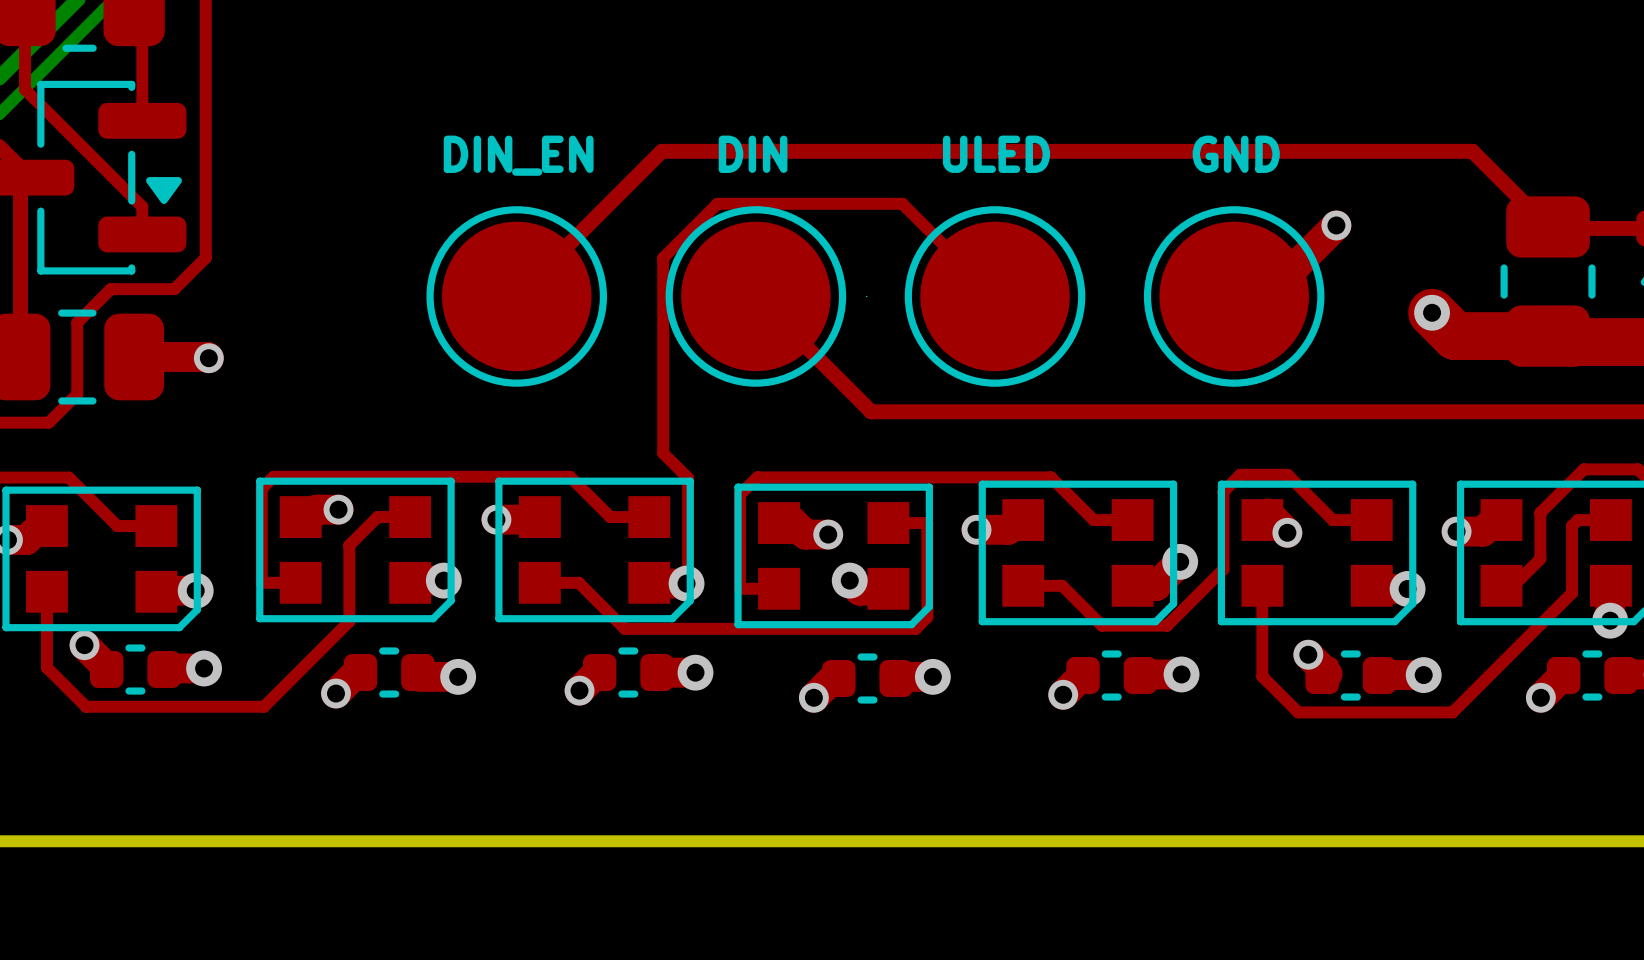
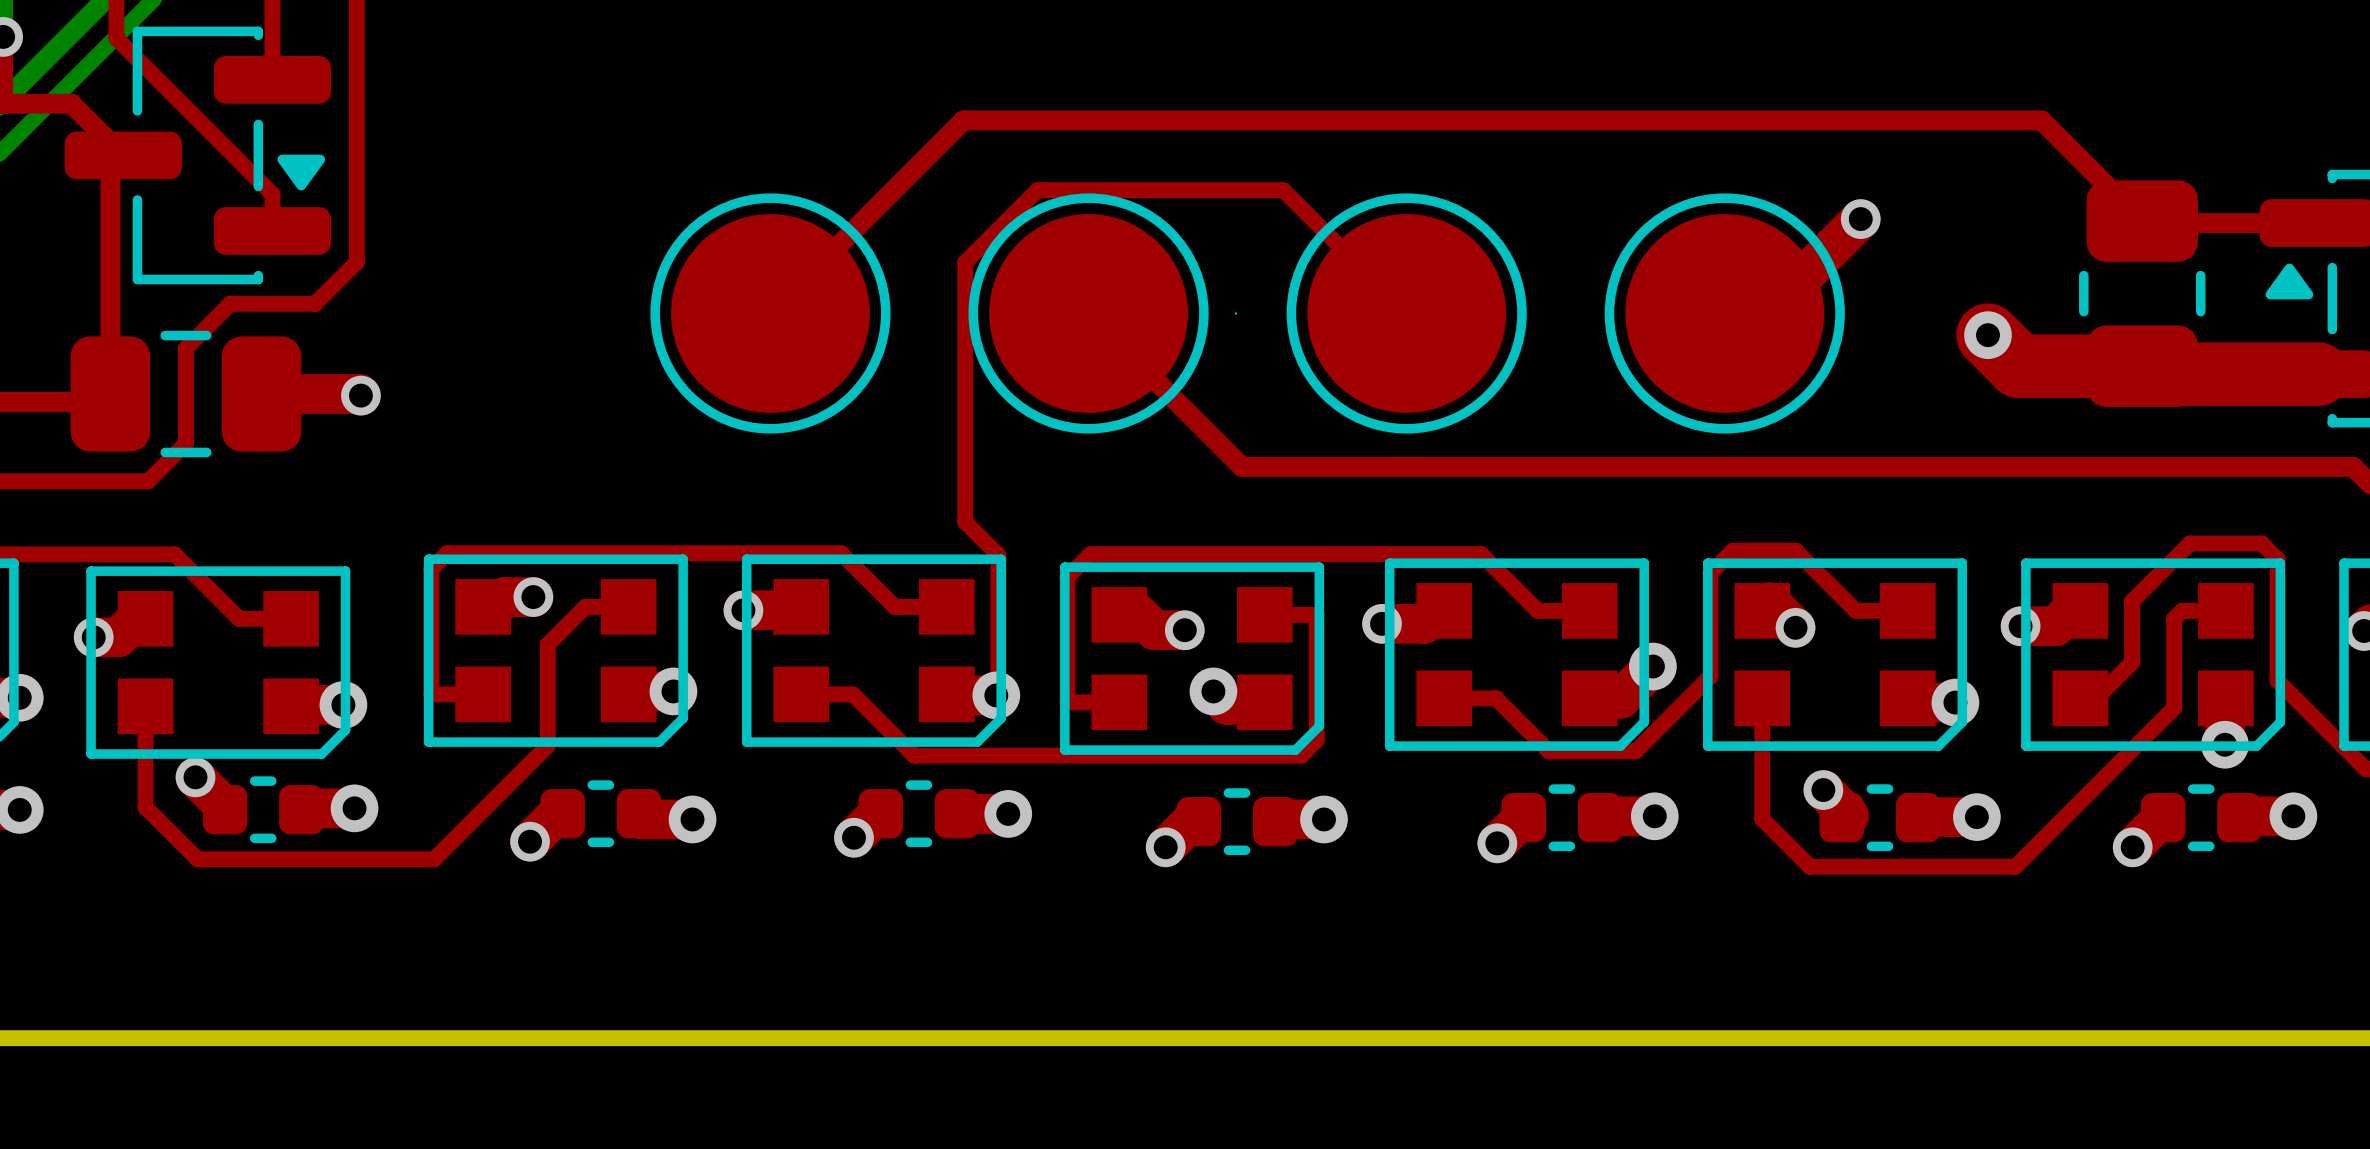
text: DIN (753, 154) -> none
text: ULED (996, 154) -> none
text: GND (1236, 154) -> none
text: DIN_EN (518, 155) -> none

